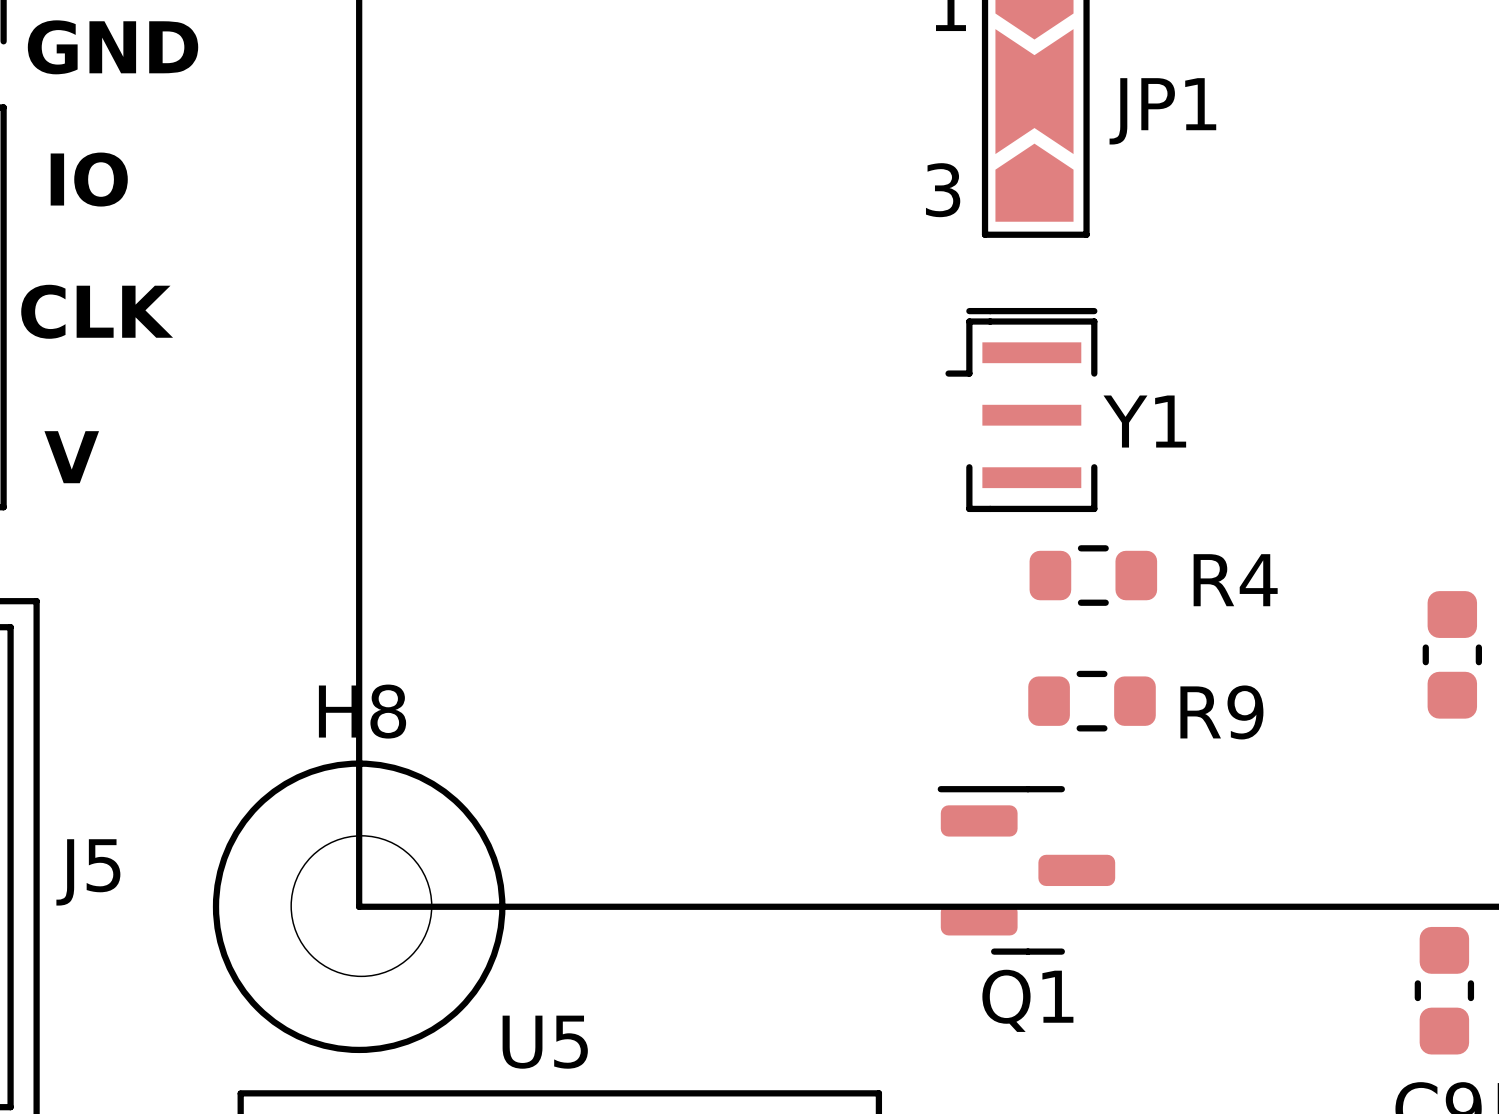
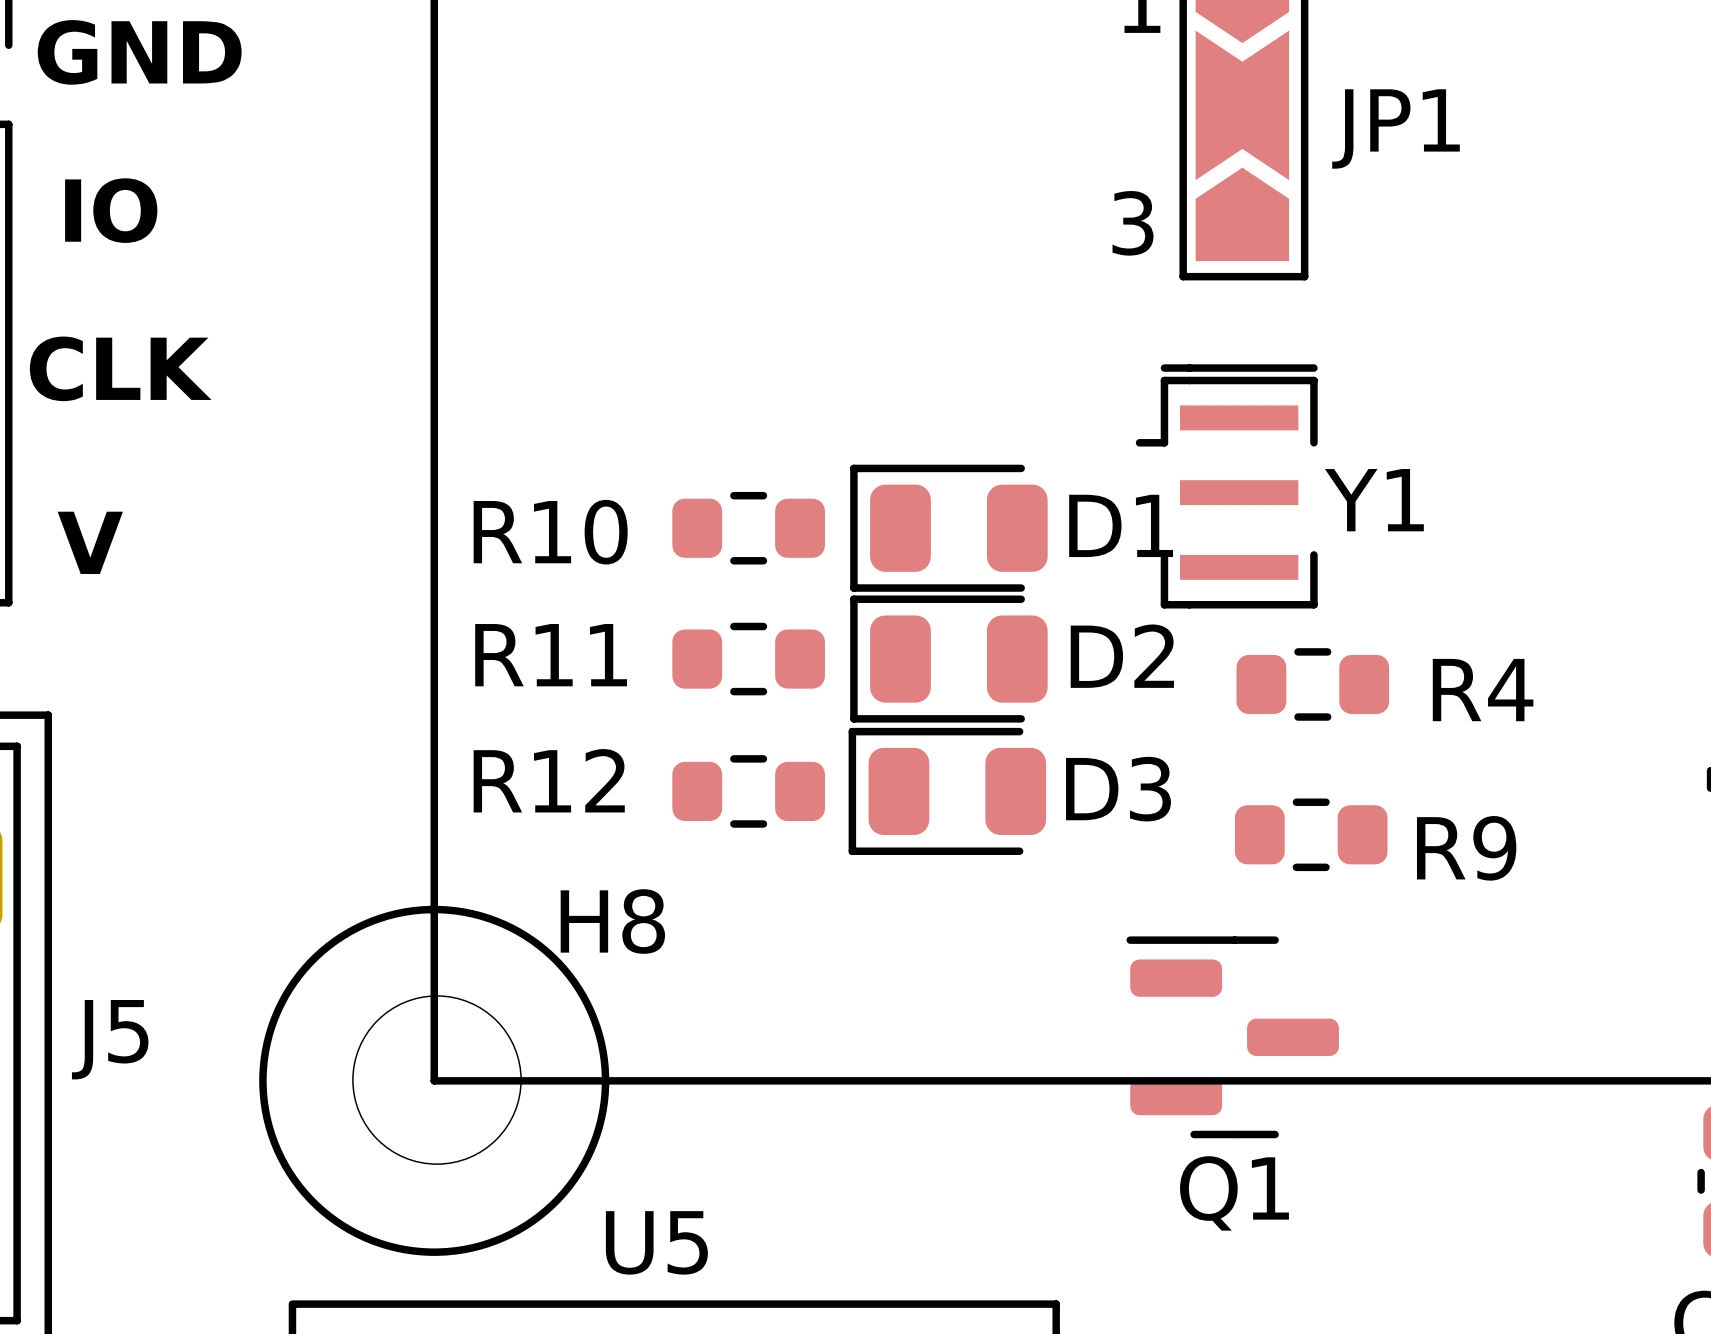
R10: none -> (748, 528)
D1: none -> (948, 528)
R11: none -> (748, 659)
D2: none -> (948, 659)
R12: none -> (748, 791)
D3: none -> (947, 791)
H8 name position: H8 (362, 711) -> H8 (612, 921)

